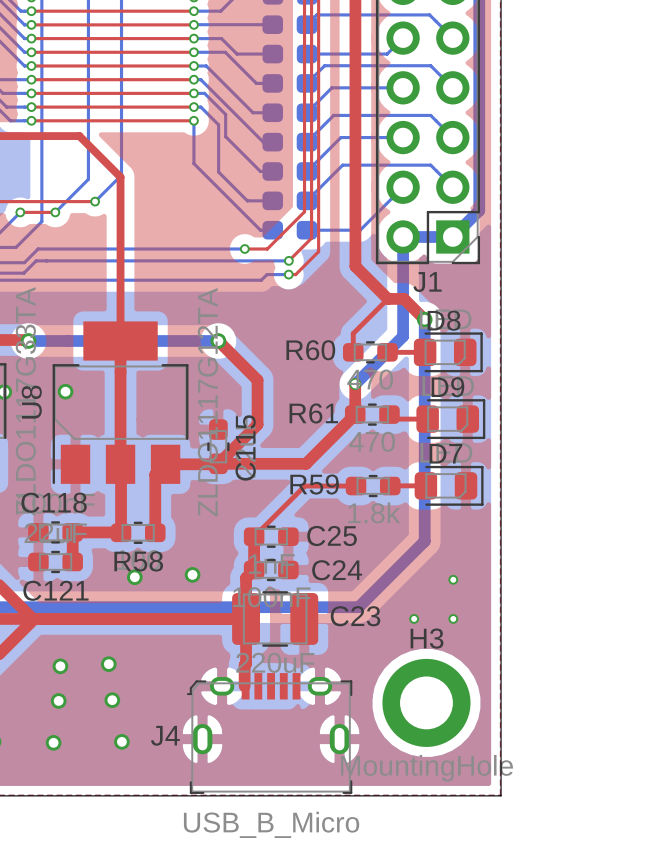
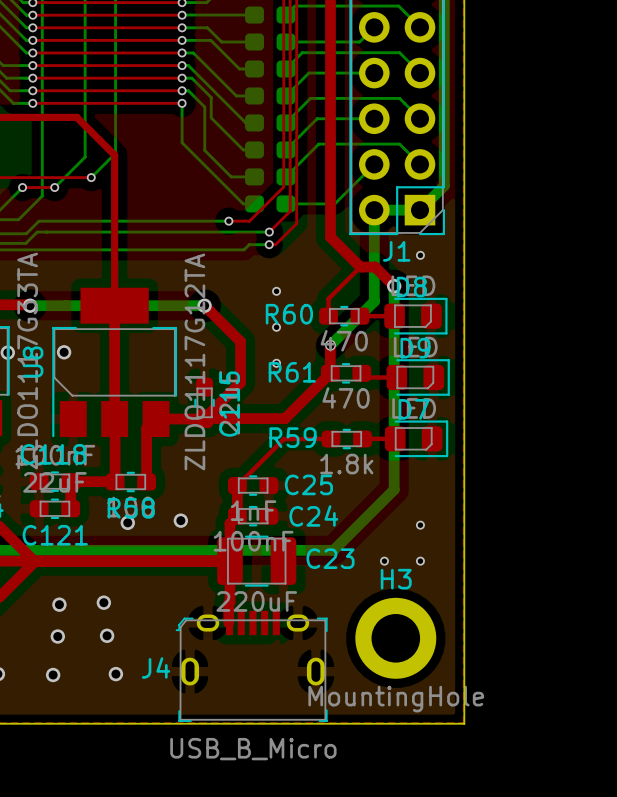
via: none -> (420, 255)
via: none -> (276, 291)
via: none -> (276, 327)
via: none -> (276, 363)

